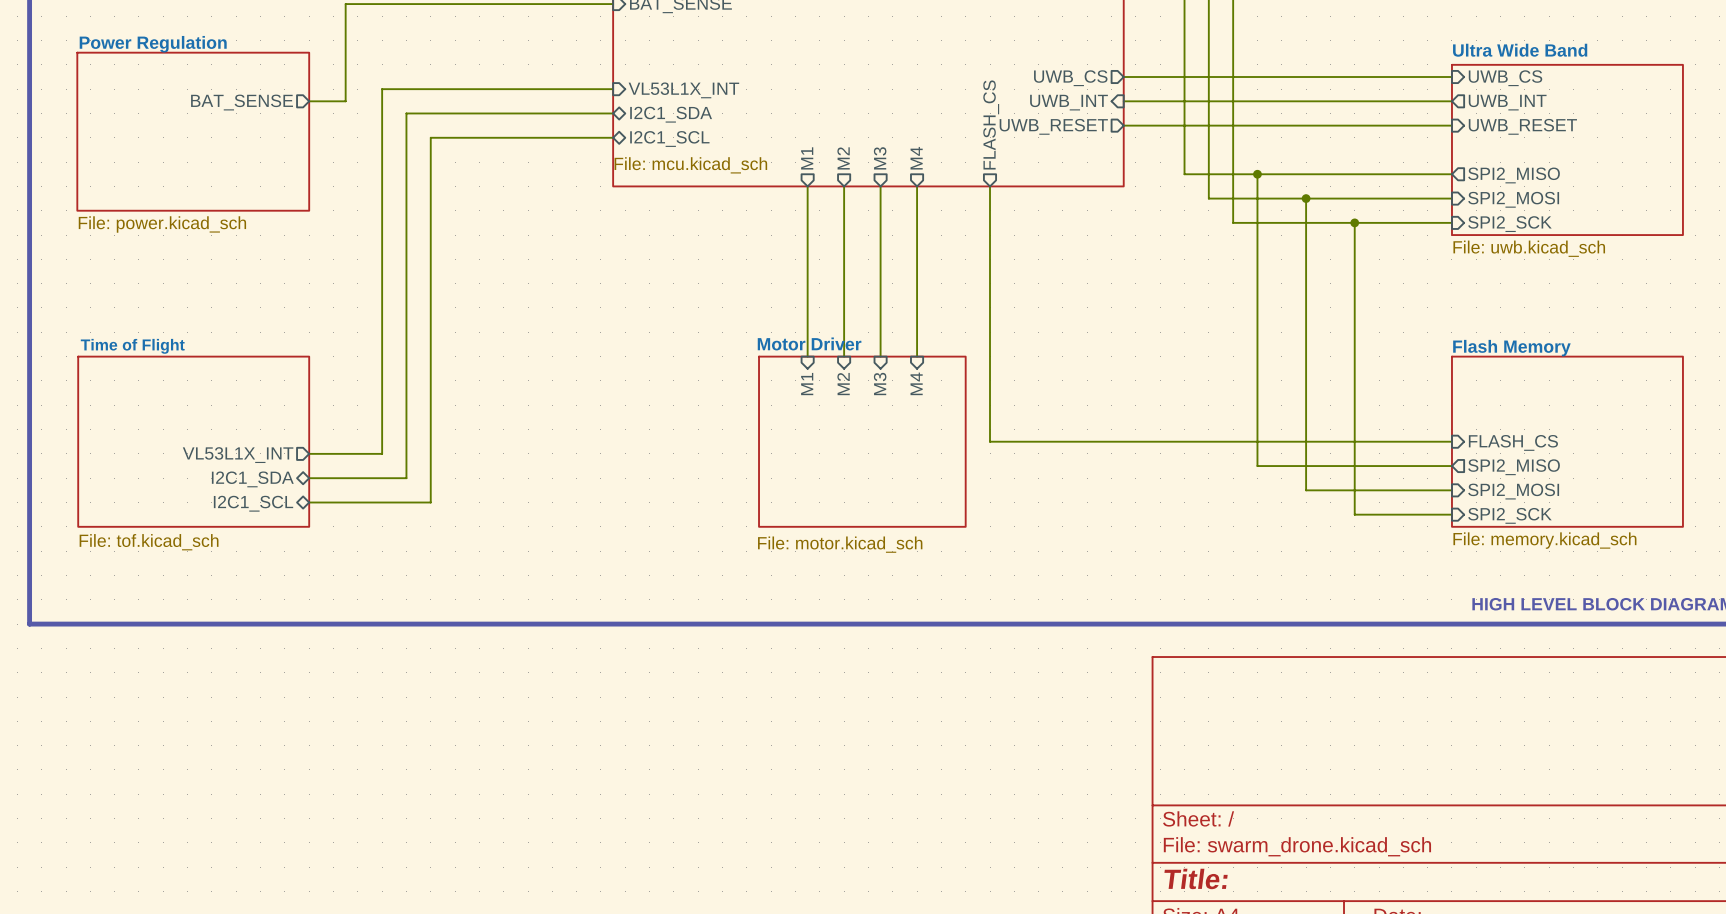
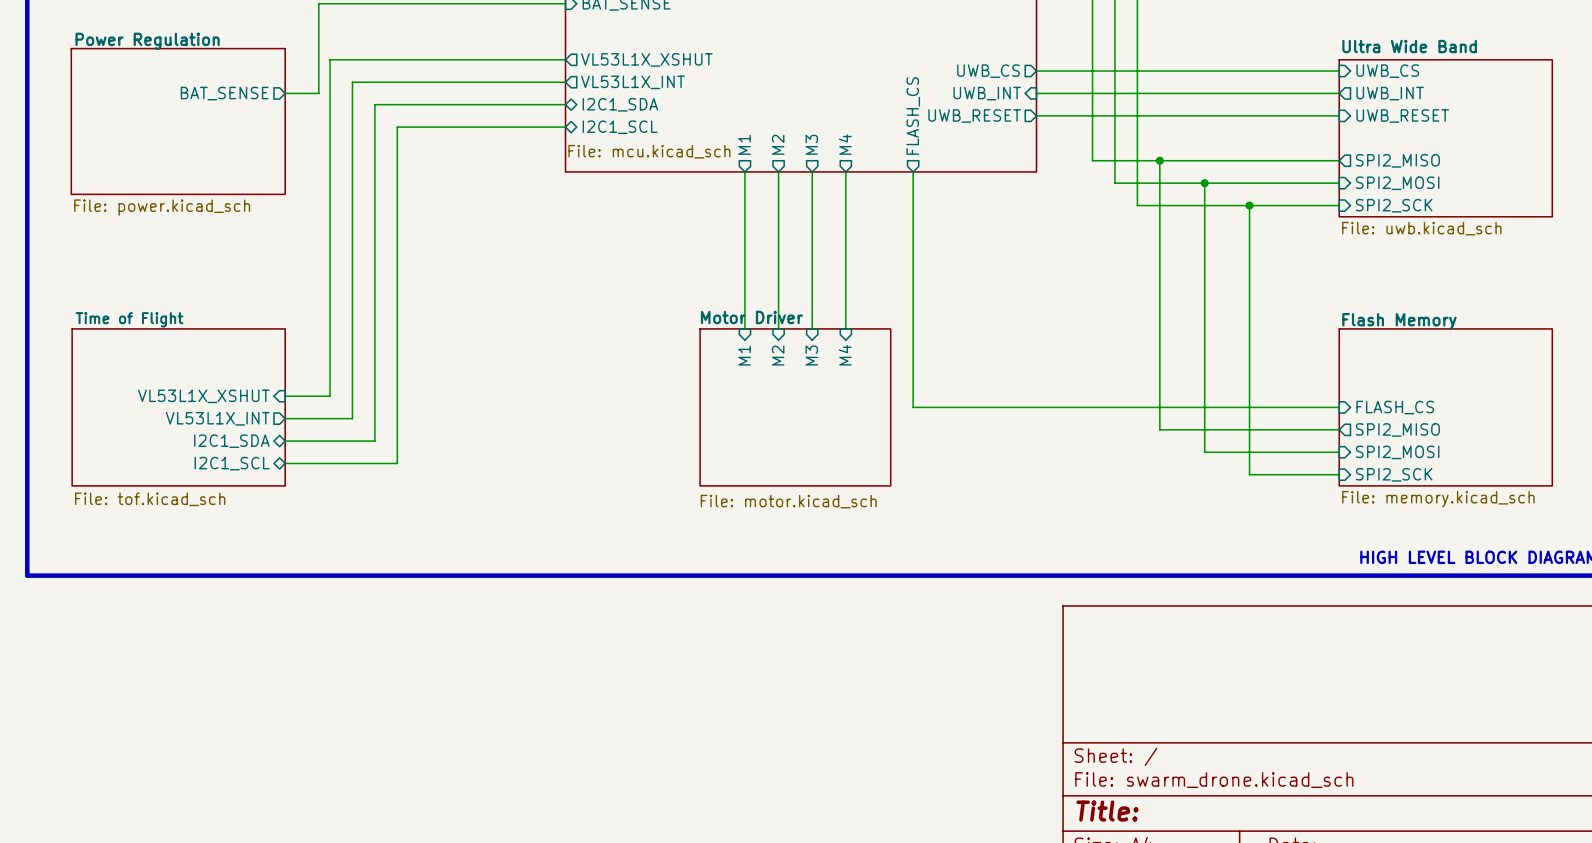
wire: none -> (565, 59) (330, 59) (330, 396) (285, 396)
sheet pin: none -> VL53L1X_XSHUT (646, 59)
sheet pin shape: input (683, 90) -> output (632, 82)
sheet pin: none -> VL53L1X_XSHUT (203, 396)

